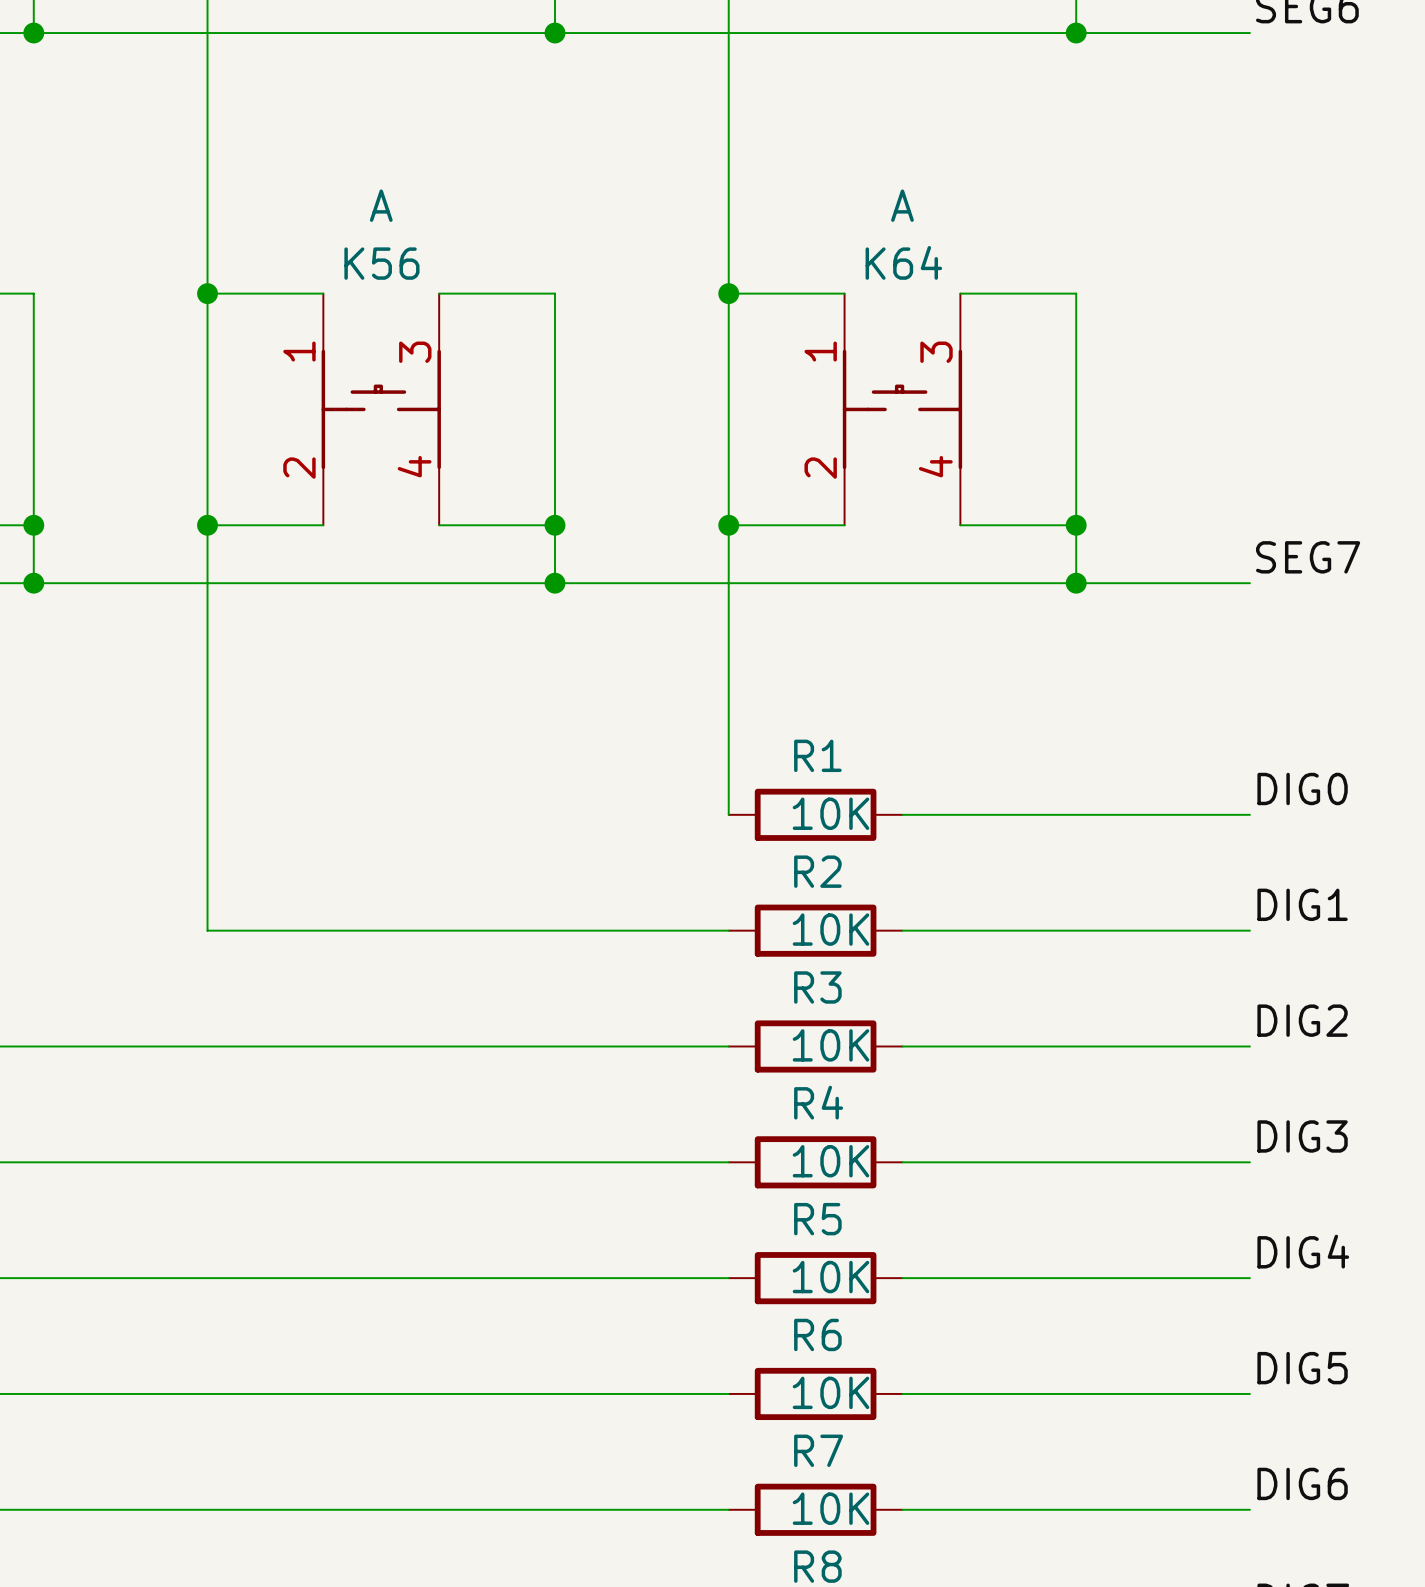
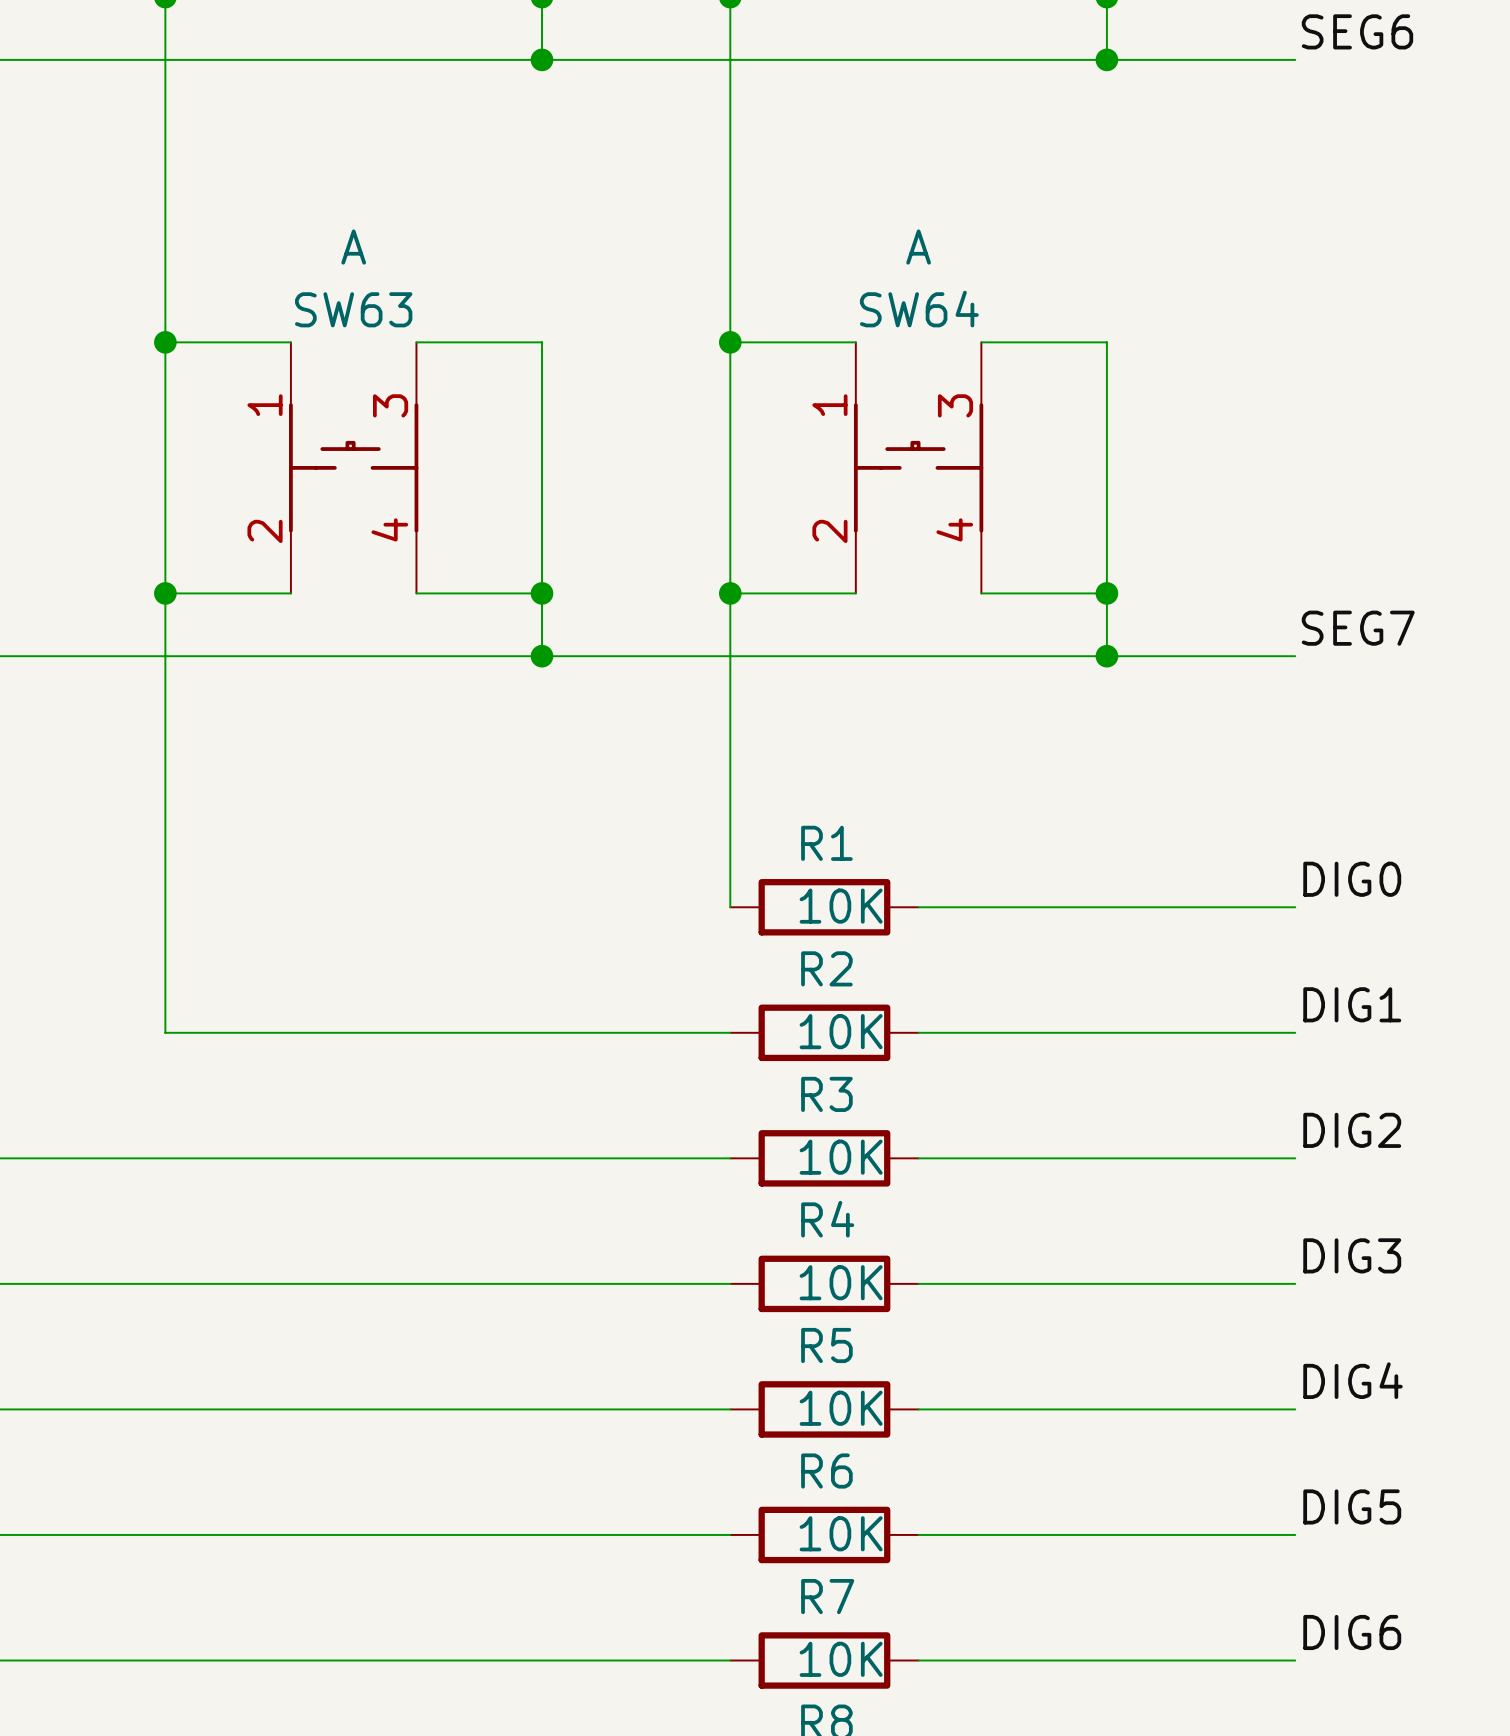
K64 name: K64 (903, 262) -> SW64 (919, 309)
K56 name: K56 (381, 263) -> SW63 (353, 309)

